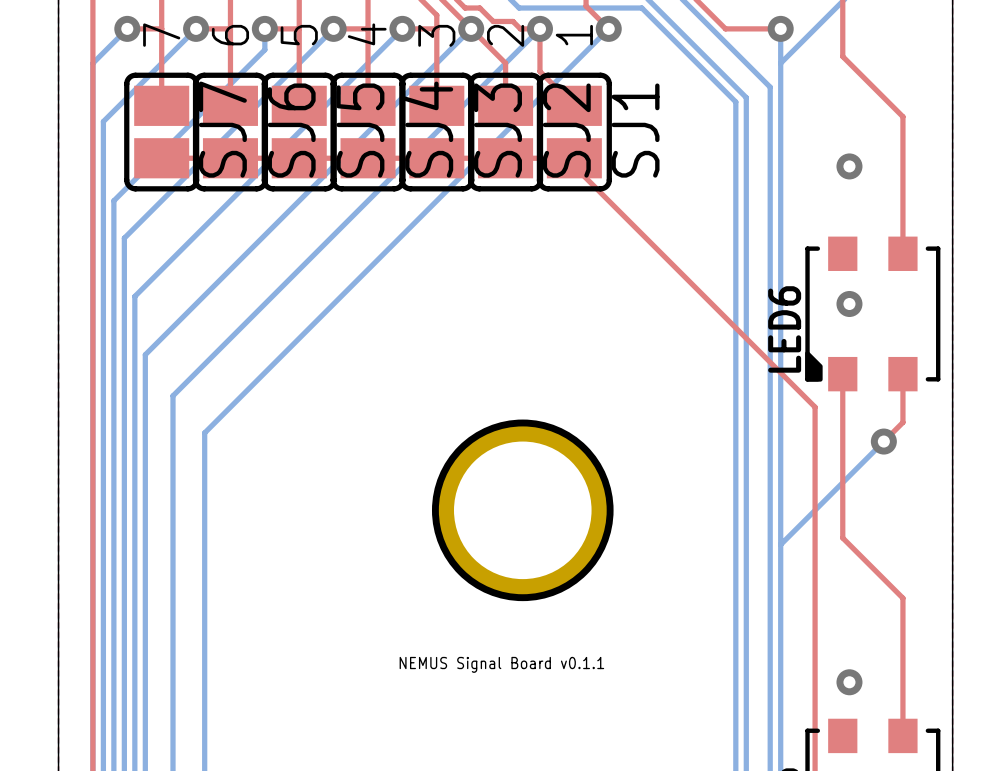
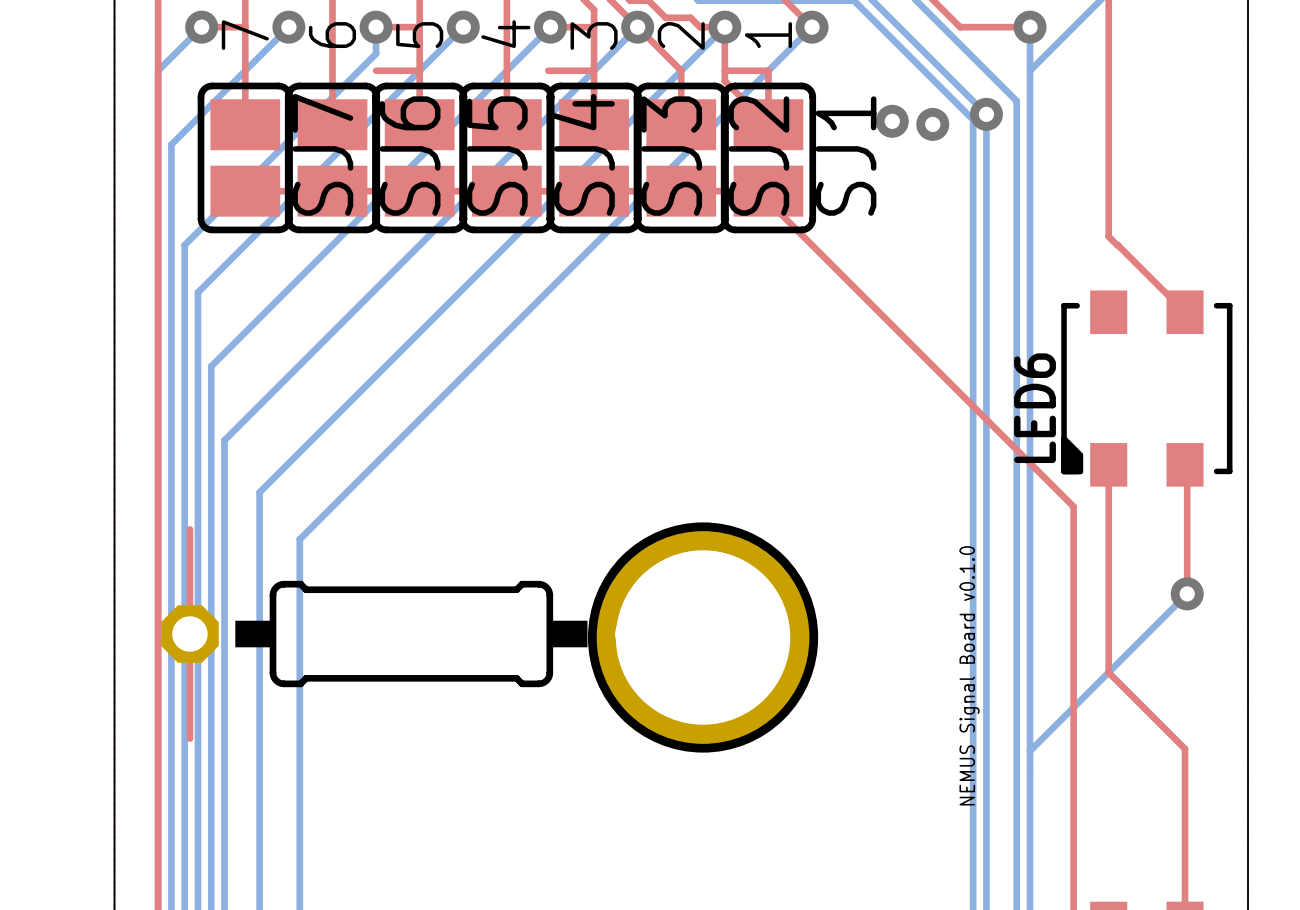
top track: (196, 28) (230, 28) -> (376, 70) (419, 70)
top track: (333, 28) (368, 28) -> none
top track: (842, 56) (902, 116) (902, 253) -> (1108, 62) (1108, 236) (1117, 245)
top track: none -> (548, 70) (594, 70)
top track: none -> (724, 70) (768, 70) (768, 124)
via: none -> (986, 114)
via: none -> (892, 121)
via: none -> (932, 124)
via: (849, 166) -> none
top track: none -> (1117, 245) (1185, 312)
via: (849, 303) -> none
top track: (902, 374) (902, 422) (883, 441) -> (1185, 464) (1187, 467) (1187, 593)
top track: none -> (189, 529) (189, 738)
bottom track: (883, 441) (780, 544) -> none
via position: (883, 441) -> (1187, 593)
bottom track: none -> (1187, 593) (1030, 751)
part: none -> (411, 634)
text: none -> NEMUS Signal Board v0.1.0 (969, 675)
text: NEMUS Signal Board v0.1.1 (501, 664) -> none
via: (849, 682) -> none

